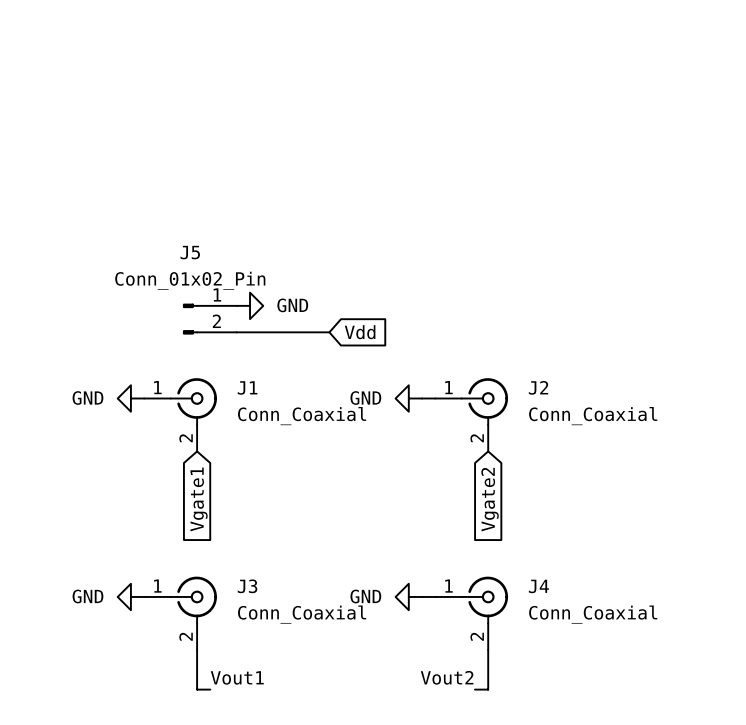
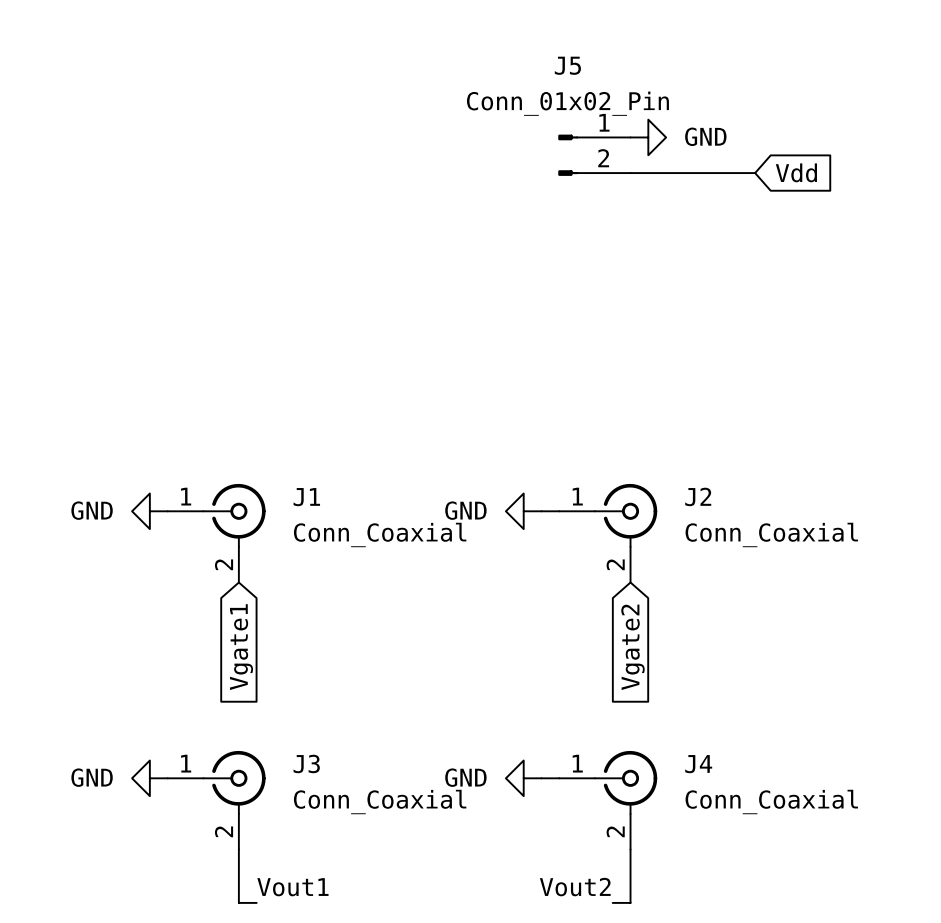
power symbol: none -> GND (648, 137)
global label: none -> Vdd (796, 172)
wire: none -> (630, 173) (755, 173)
power symbol: GND (250, 305) -> none
J5 position: (209, 319) -> (594, 155)
wire: (236, 332) (329, 332) -> none
global label: Vdd (360, 332) -> none

